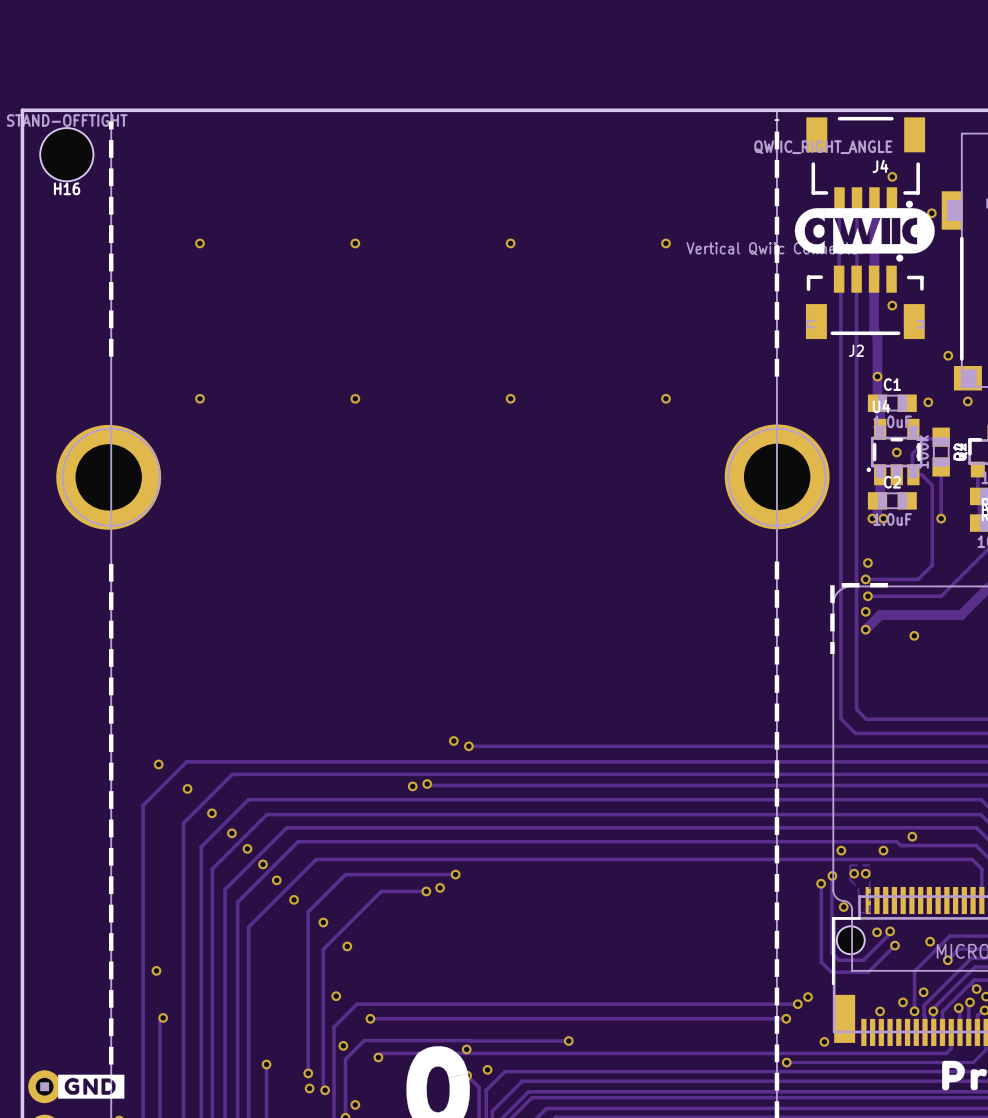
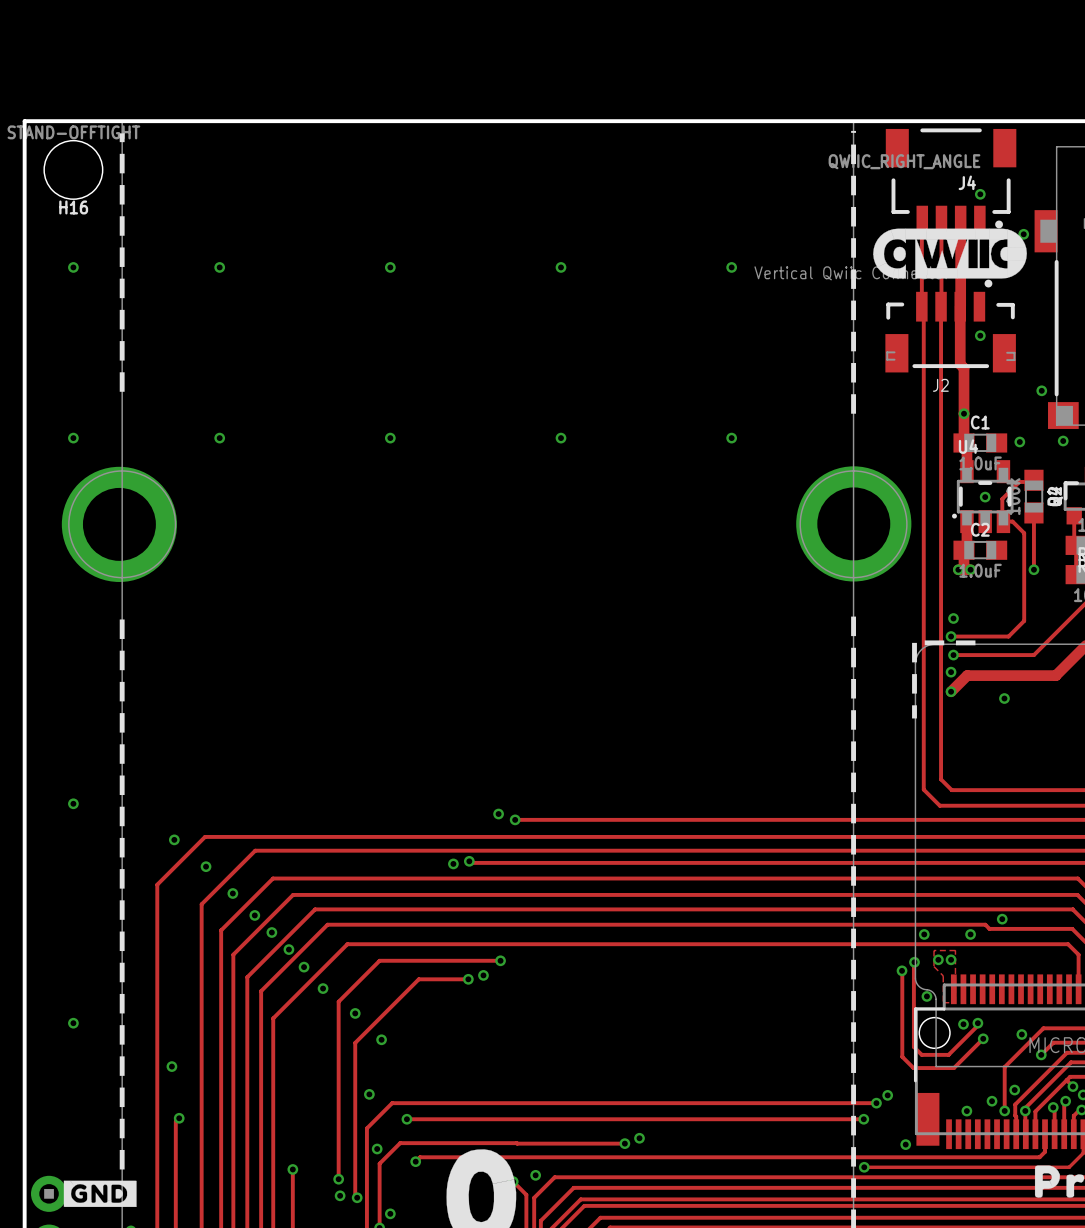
via: none -> (73, 267)
via: none -> (73, 438)
via: none -> (73, 803)
via: none -> (73, 1023)
via: none -> (639, 1138)
via: (466, 1049) -> none

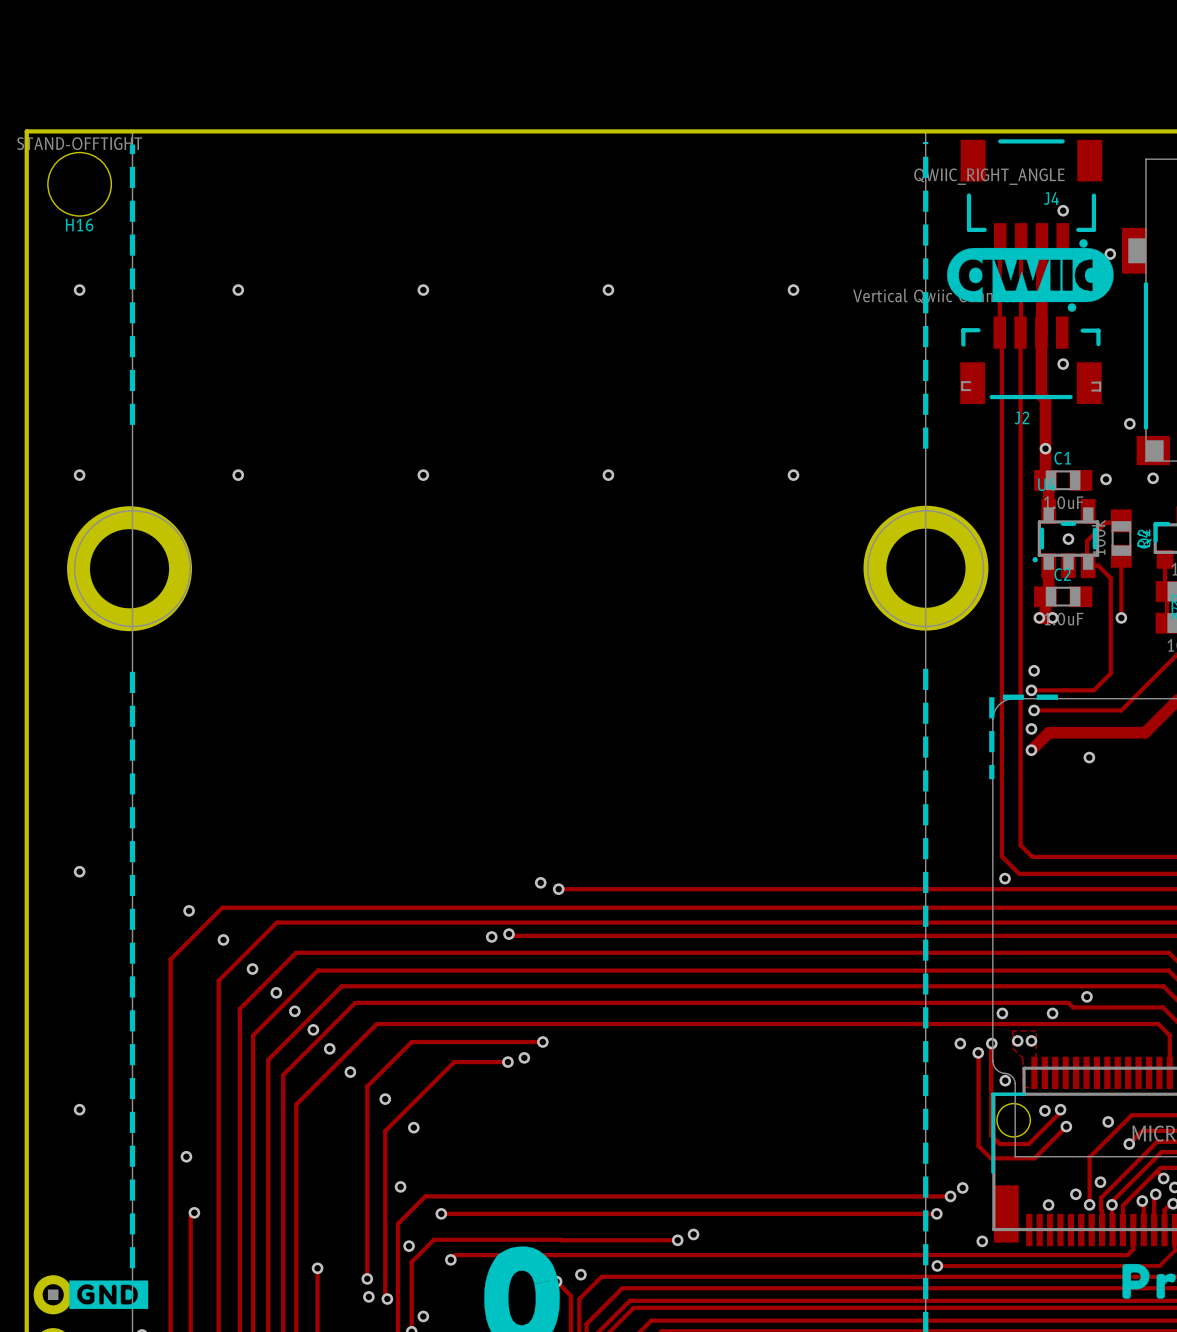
via: none -> (1005, 878)
via: none -> (960, 1043)

